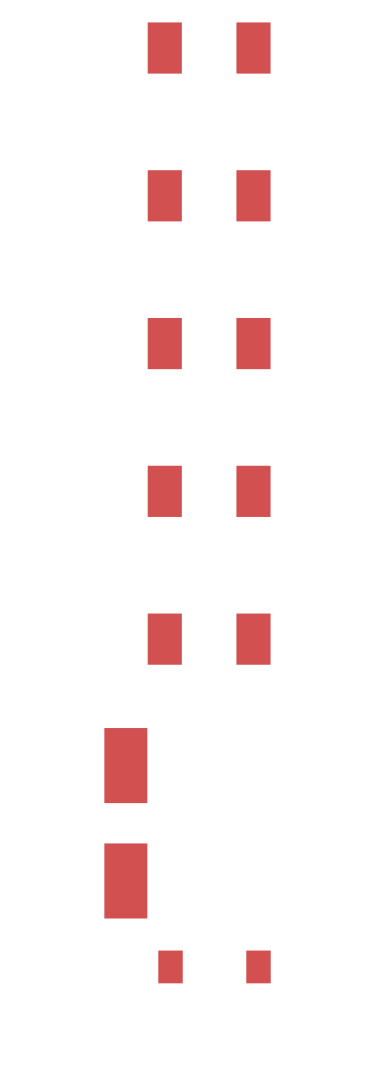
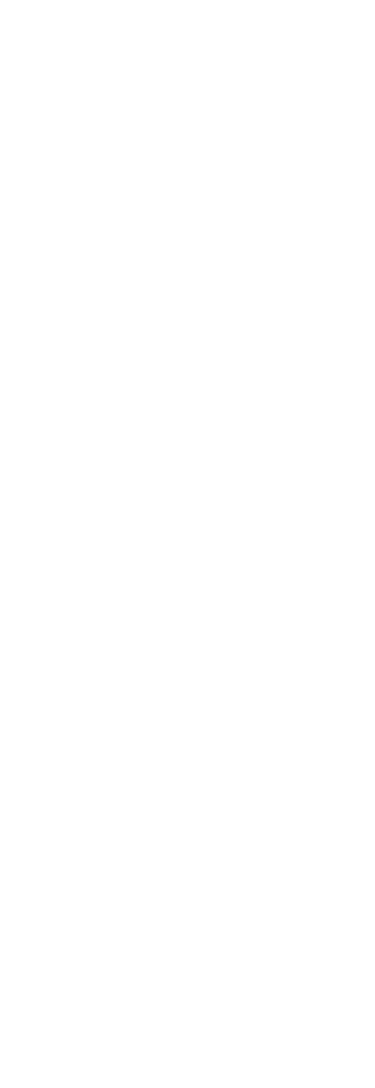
part: (209, 48) -> none
part: (209, 195) -> none
part: (209, 343) -> none
part: (209, 491) -> none
part: (209, 639) -> none
part: (125, 823) -> none
part: (214, 966) -> none

